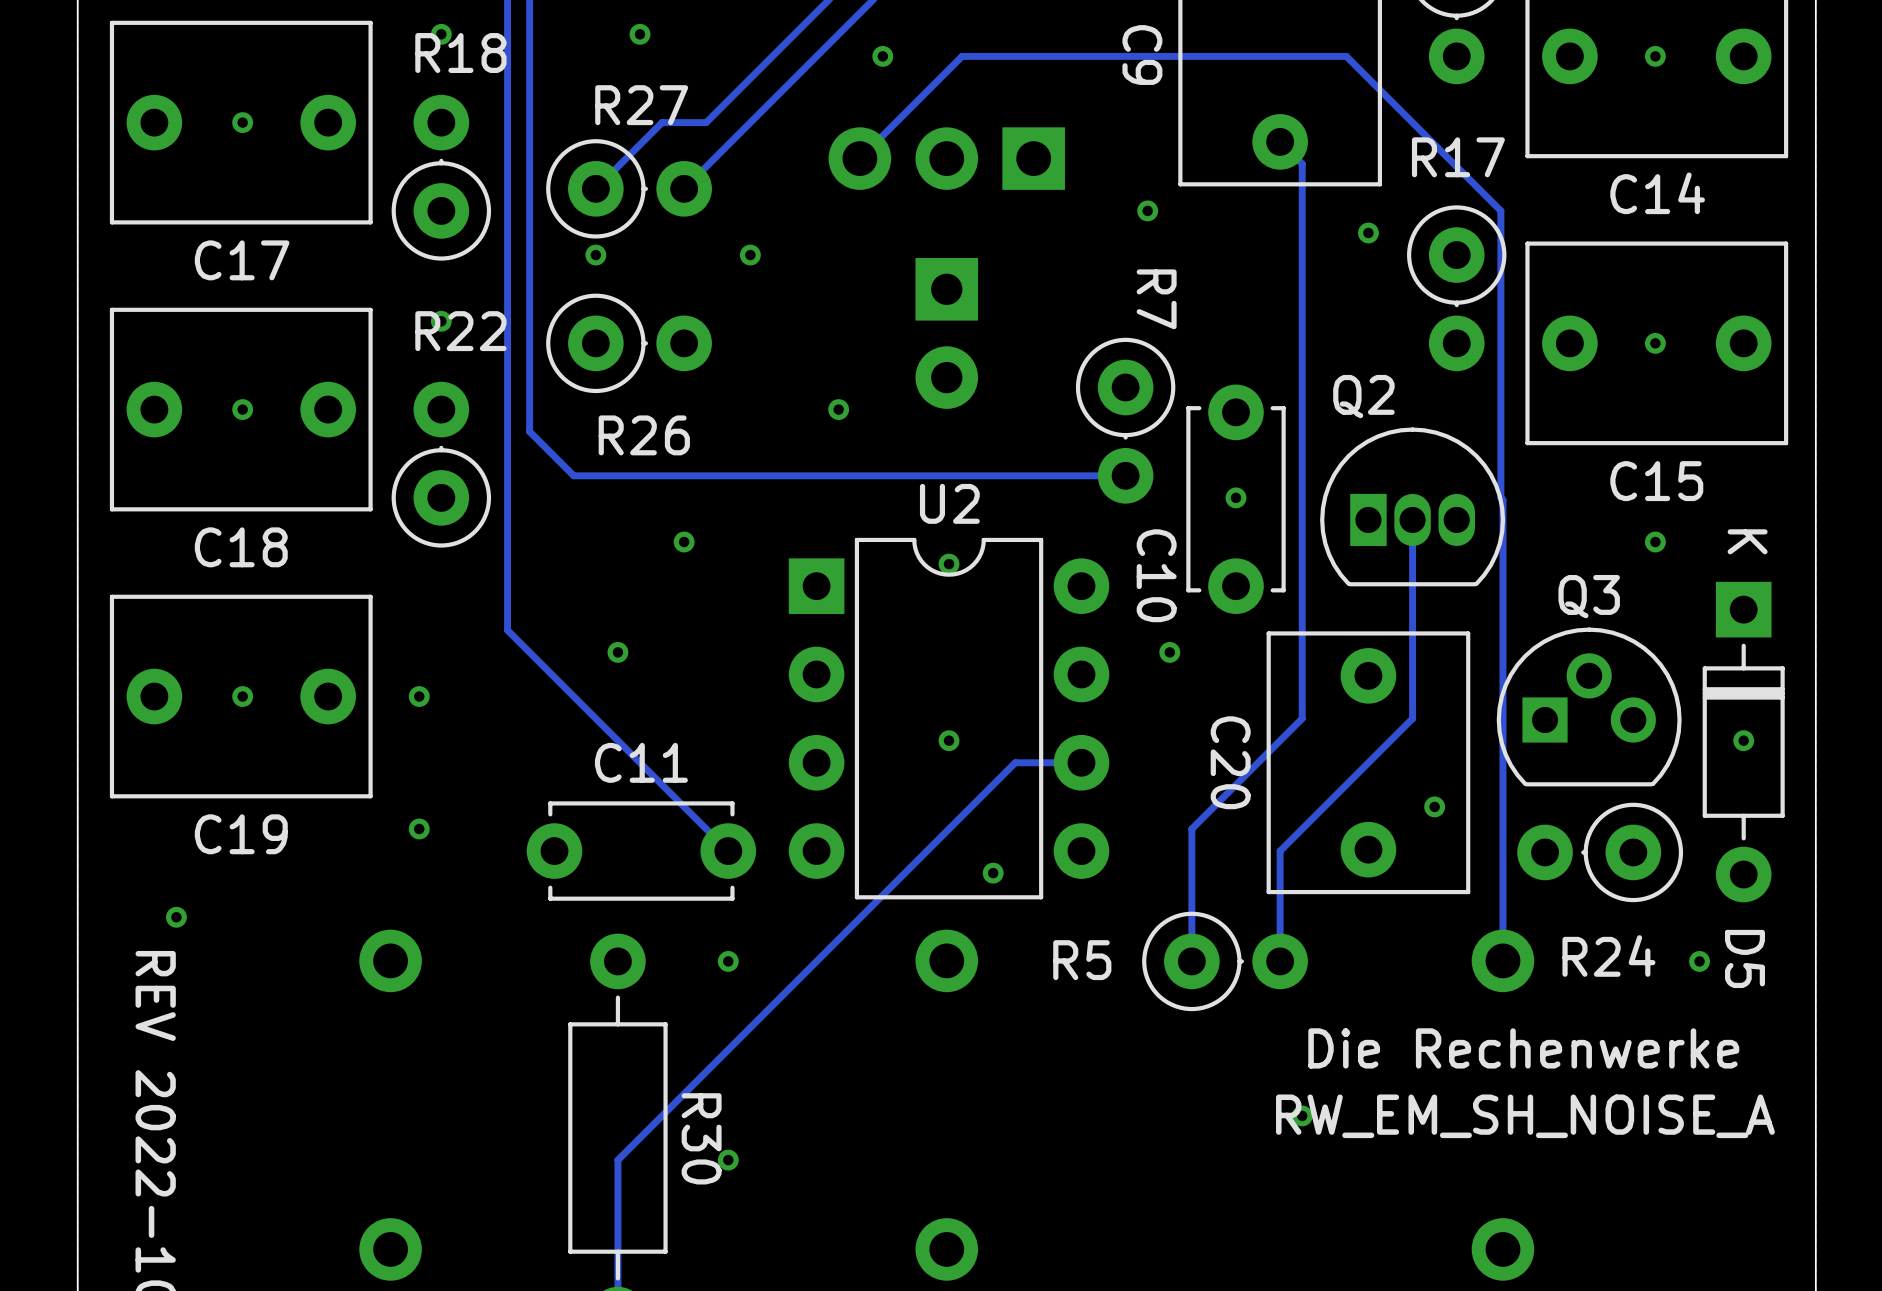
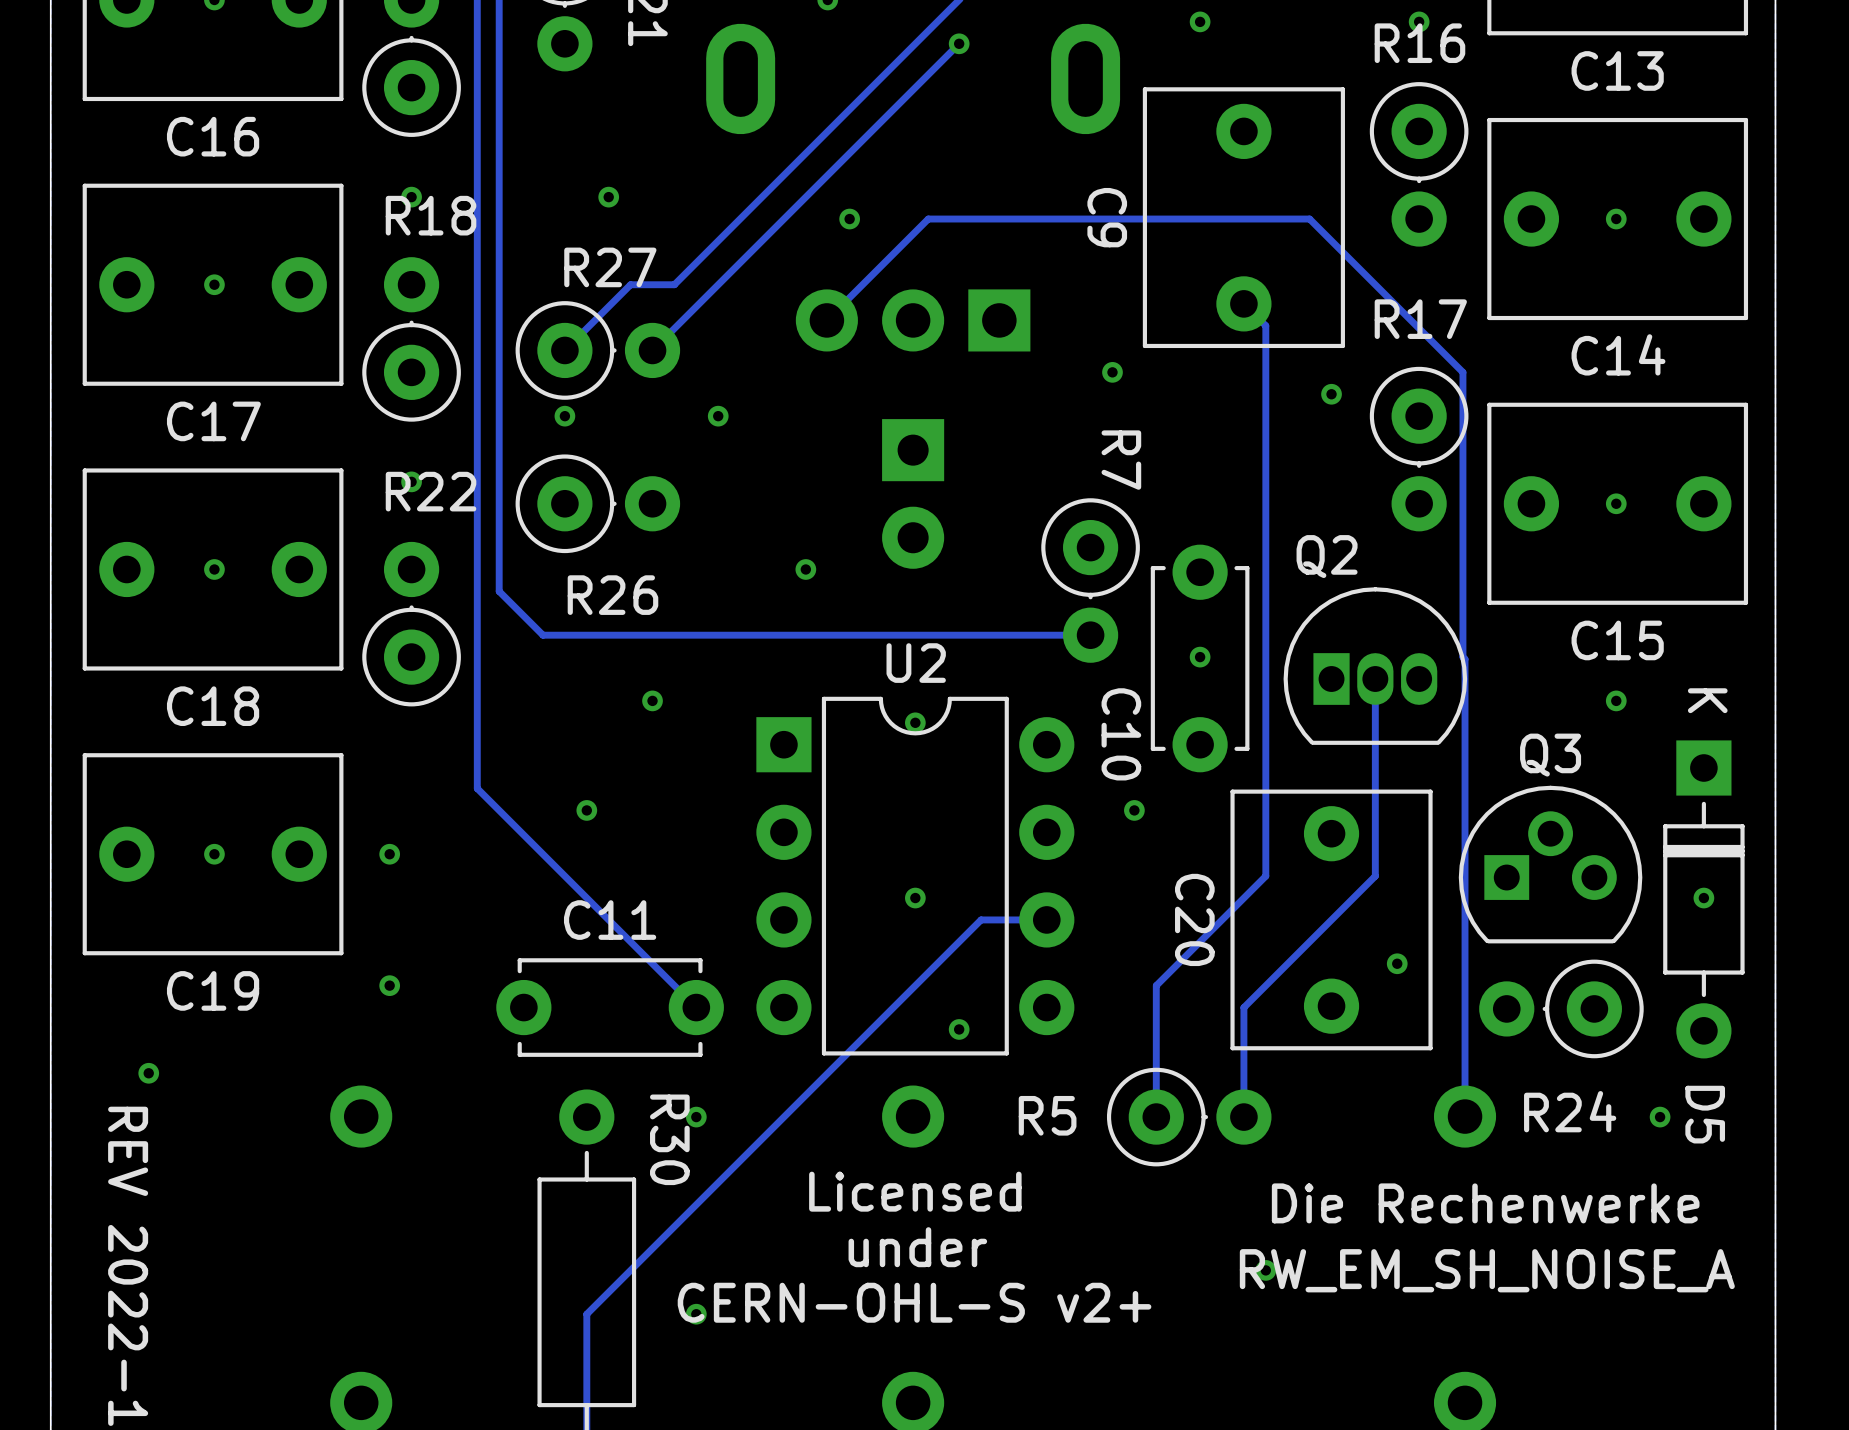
text: none -> Licensed (915, 1191)
text: none -> under (917, 1247)
R30 name position: R30 (701, 1138) -> R30 (669, 1139)
text: none -> CERN-OHL-S v2+ (914, 1302)

